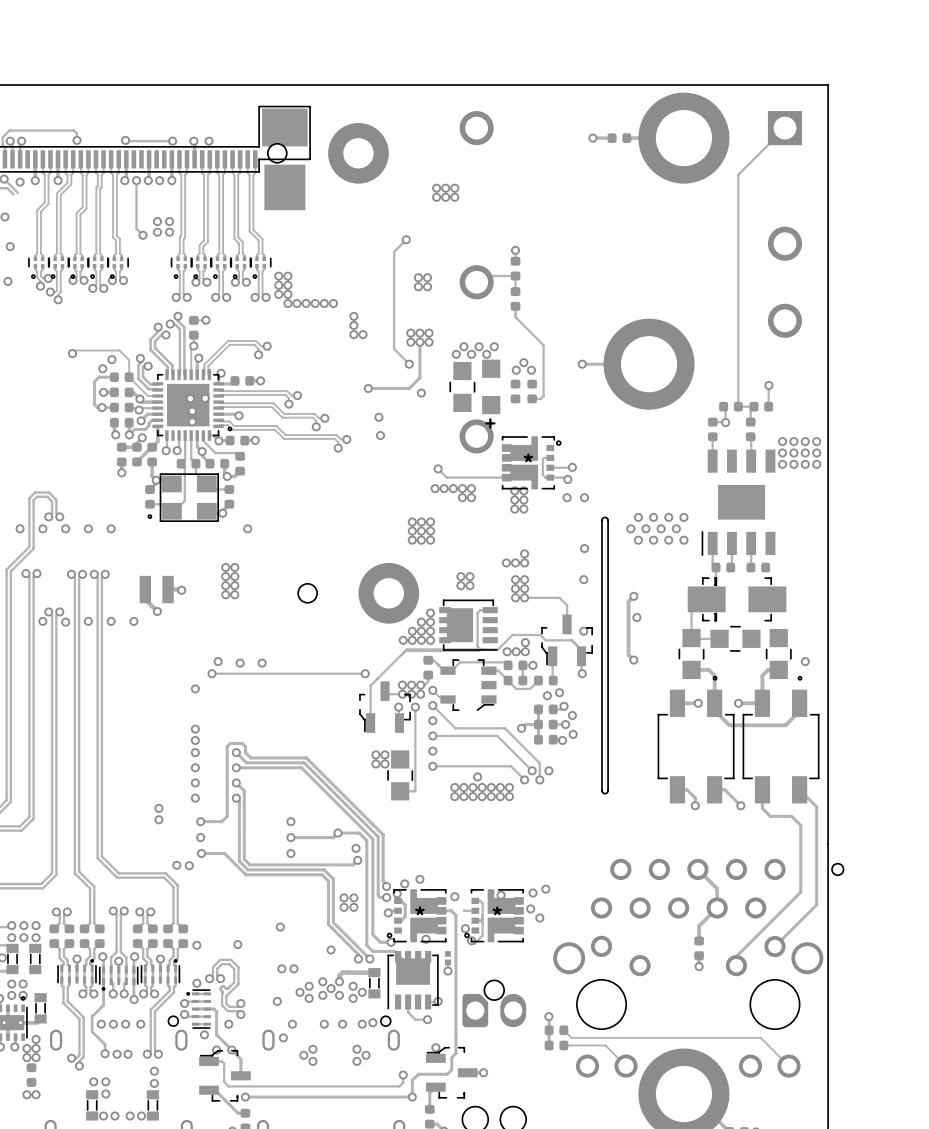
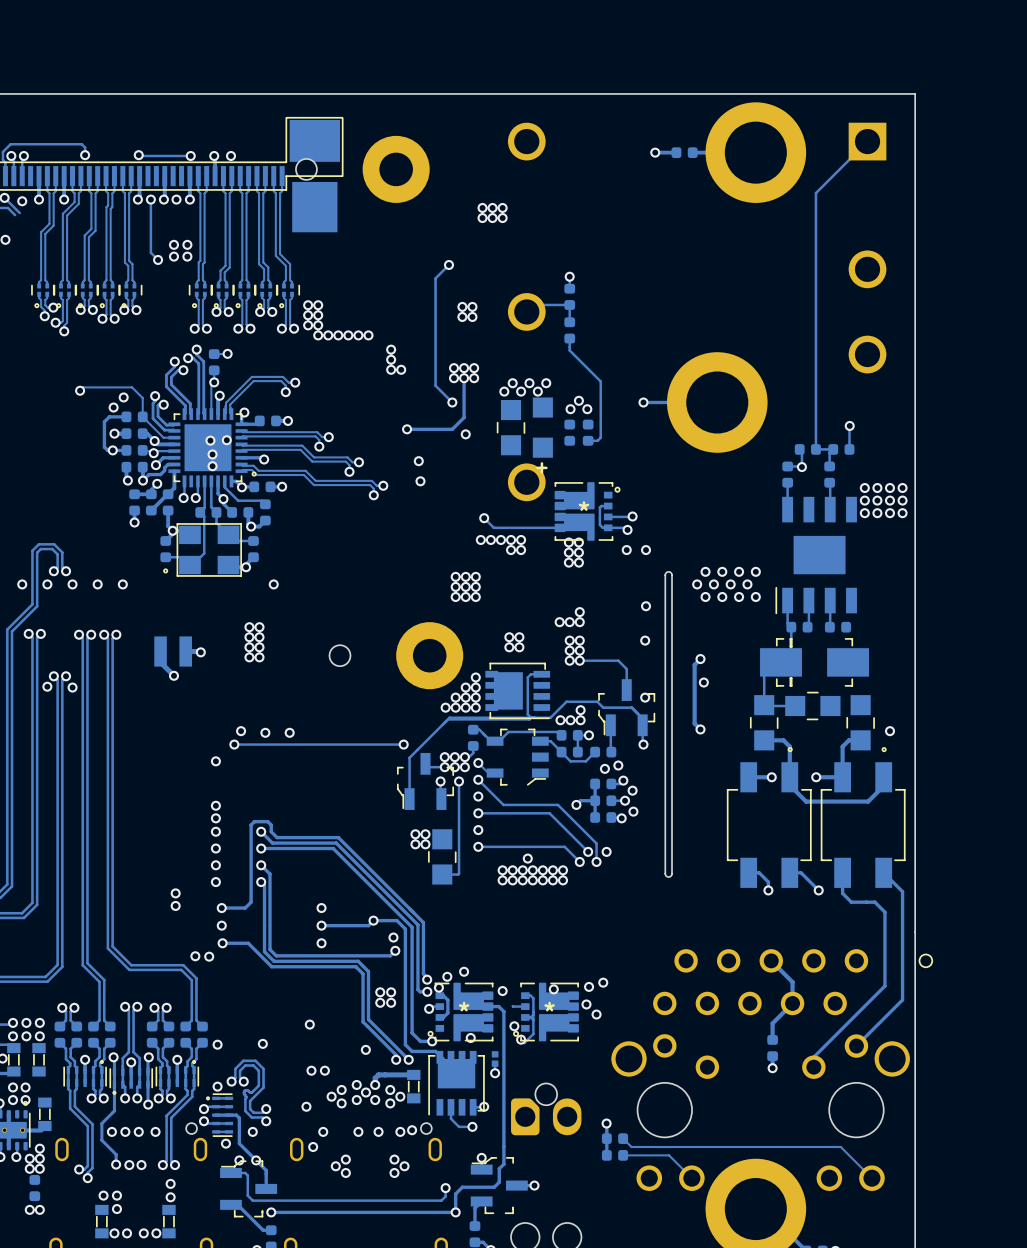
via: (10, 246) -> none
via: (7, 281) -> none
via: (88, 621) -> none
via: (111, 621) -> none
via: (133, 621) -> none

